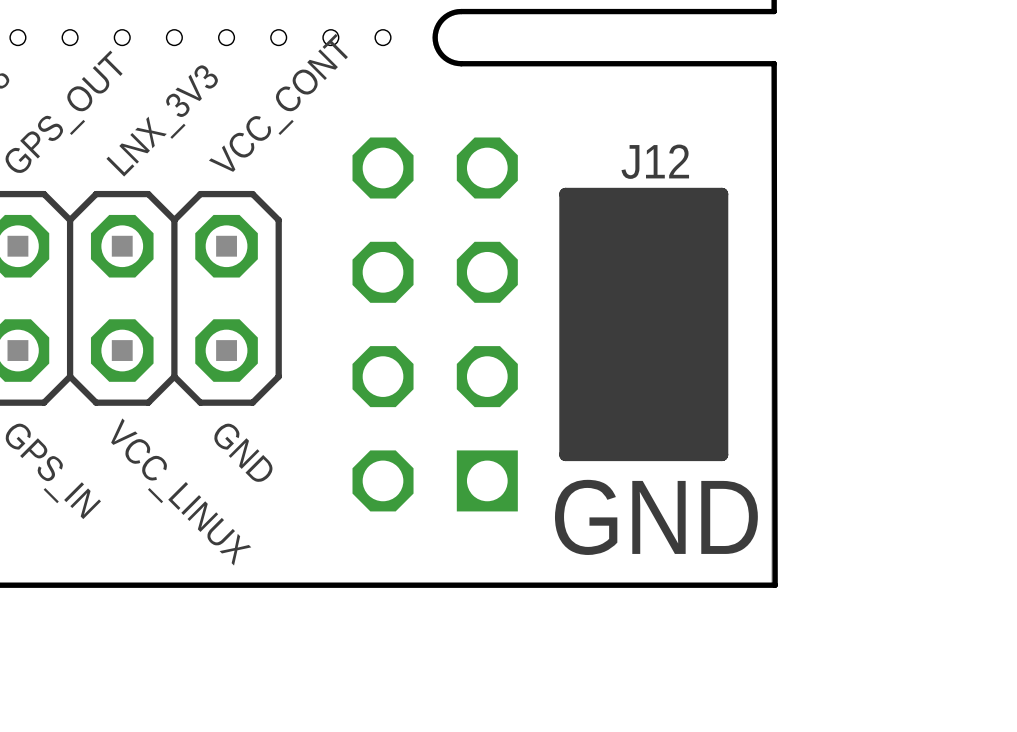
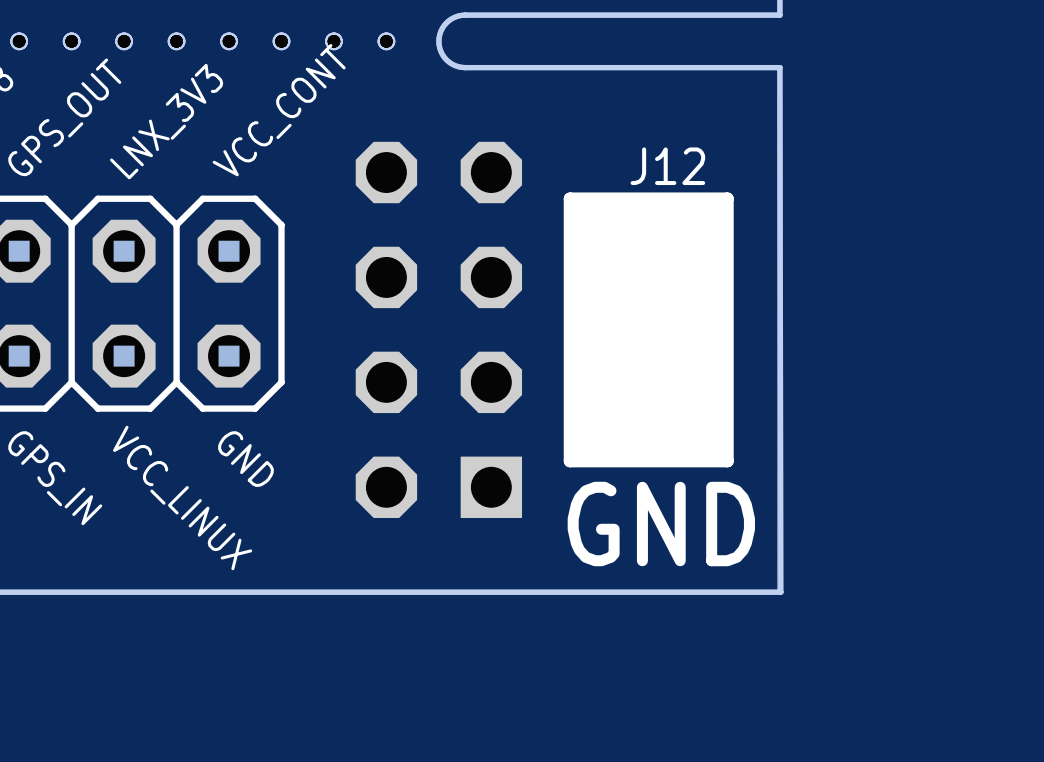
hole: none -> (19, 41)
hole: none -> (71, 41)
hole: none -> (124, 41)
hole: none -> (176, 41)
hole: none -> (229, 41)
hole: none -> (281, 41)
hole: none -> (333, 41)
hole: none -> (386, 41)

